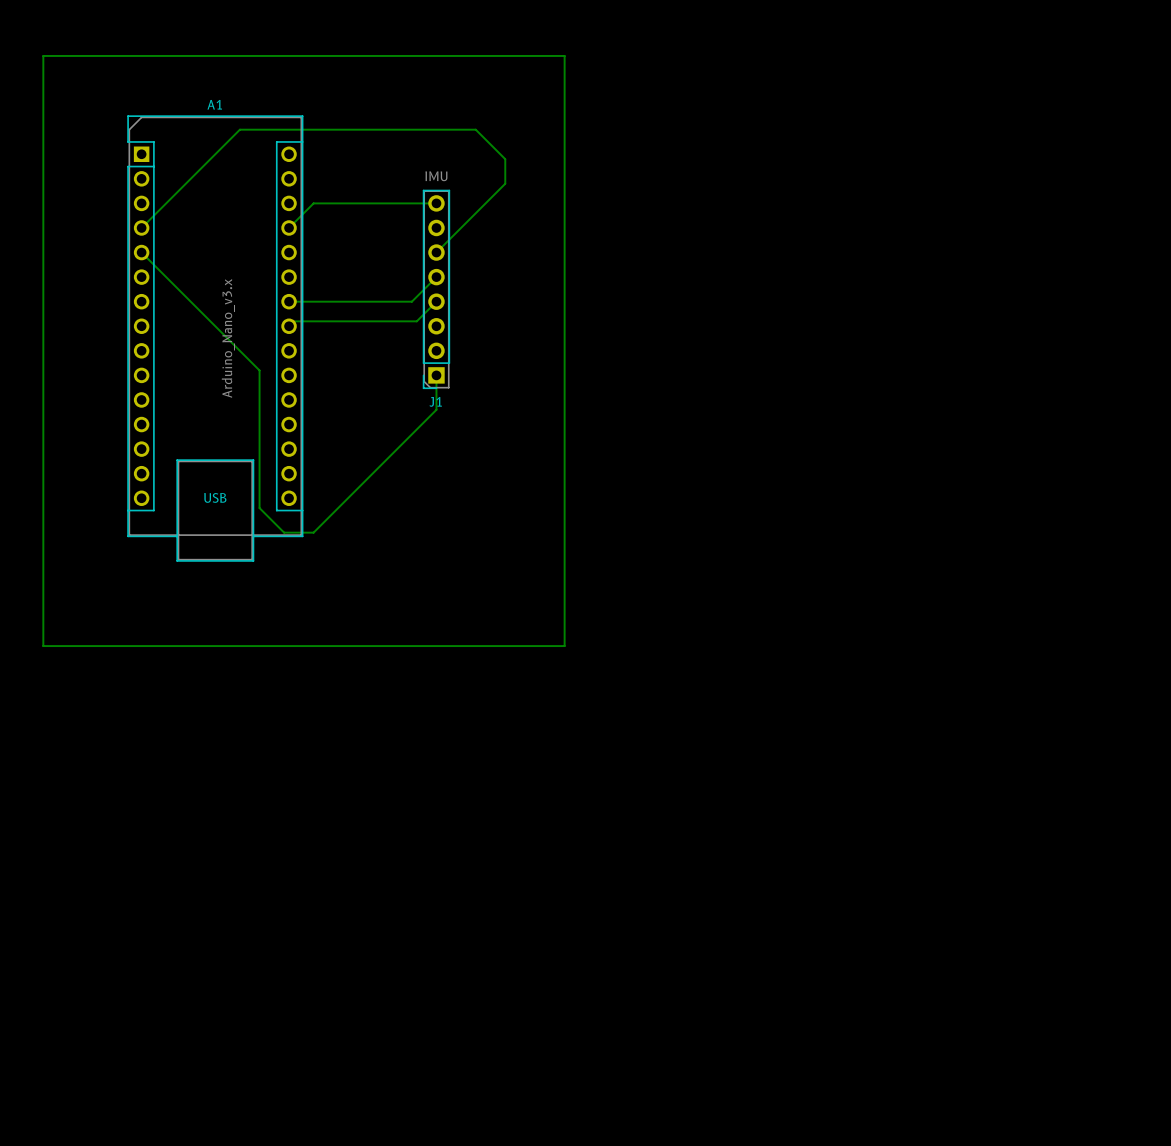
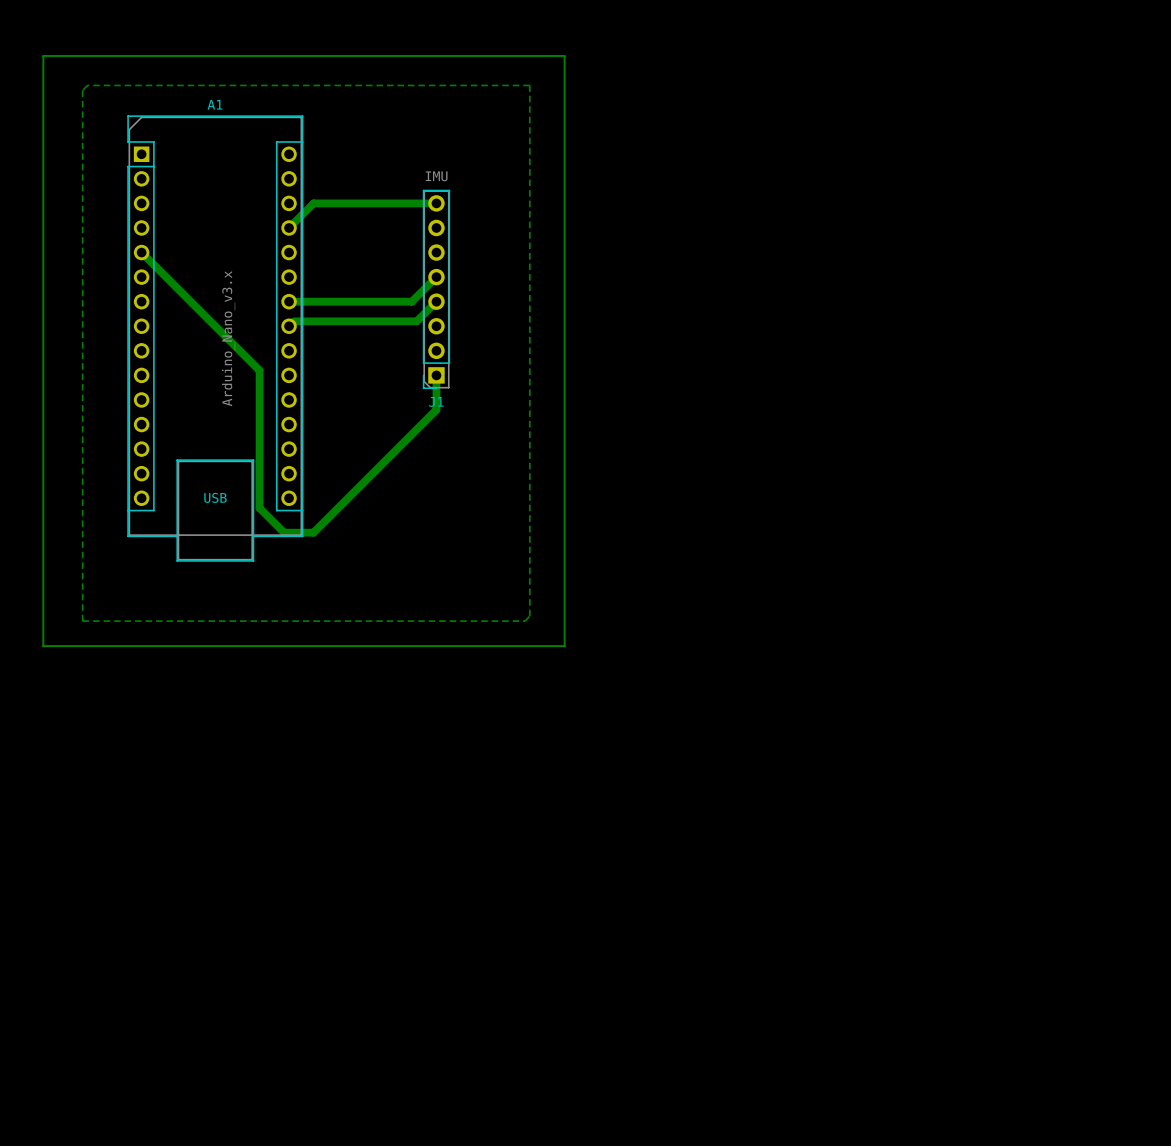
bottom zone outline: none -> (87, 85) (529, 85) (529, 616) (524, 621) (82, 621) (82, 90) (87, 85)
bottom track width: thin (436, 203) (313, 203) (289, 227) -> thick (436, 203) (313, 203) (289, 227)
bottom track: (141, 227) (239, 129) (475, 129) (505, 159) (505, 183) (436, 252) -> none
bottom track width: thin (141, 252) (259, 370) (259, 508) (284, 532) (313, 532) (436, 409) (436, 375) -> thick (141, 252) (259, 370) (259, 508) (284, 532) (313, 532) (436, 409) (436, 375)
bottom track width: thin (436, 277) (411, 301) (289, 301) -> thick (436, 277) (411, 301) (289, 301)
bottom track width: thin (436, 301) (416, 321) (293, 321) -> thick (436, 301) (416, 321) (293, 321)

